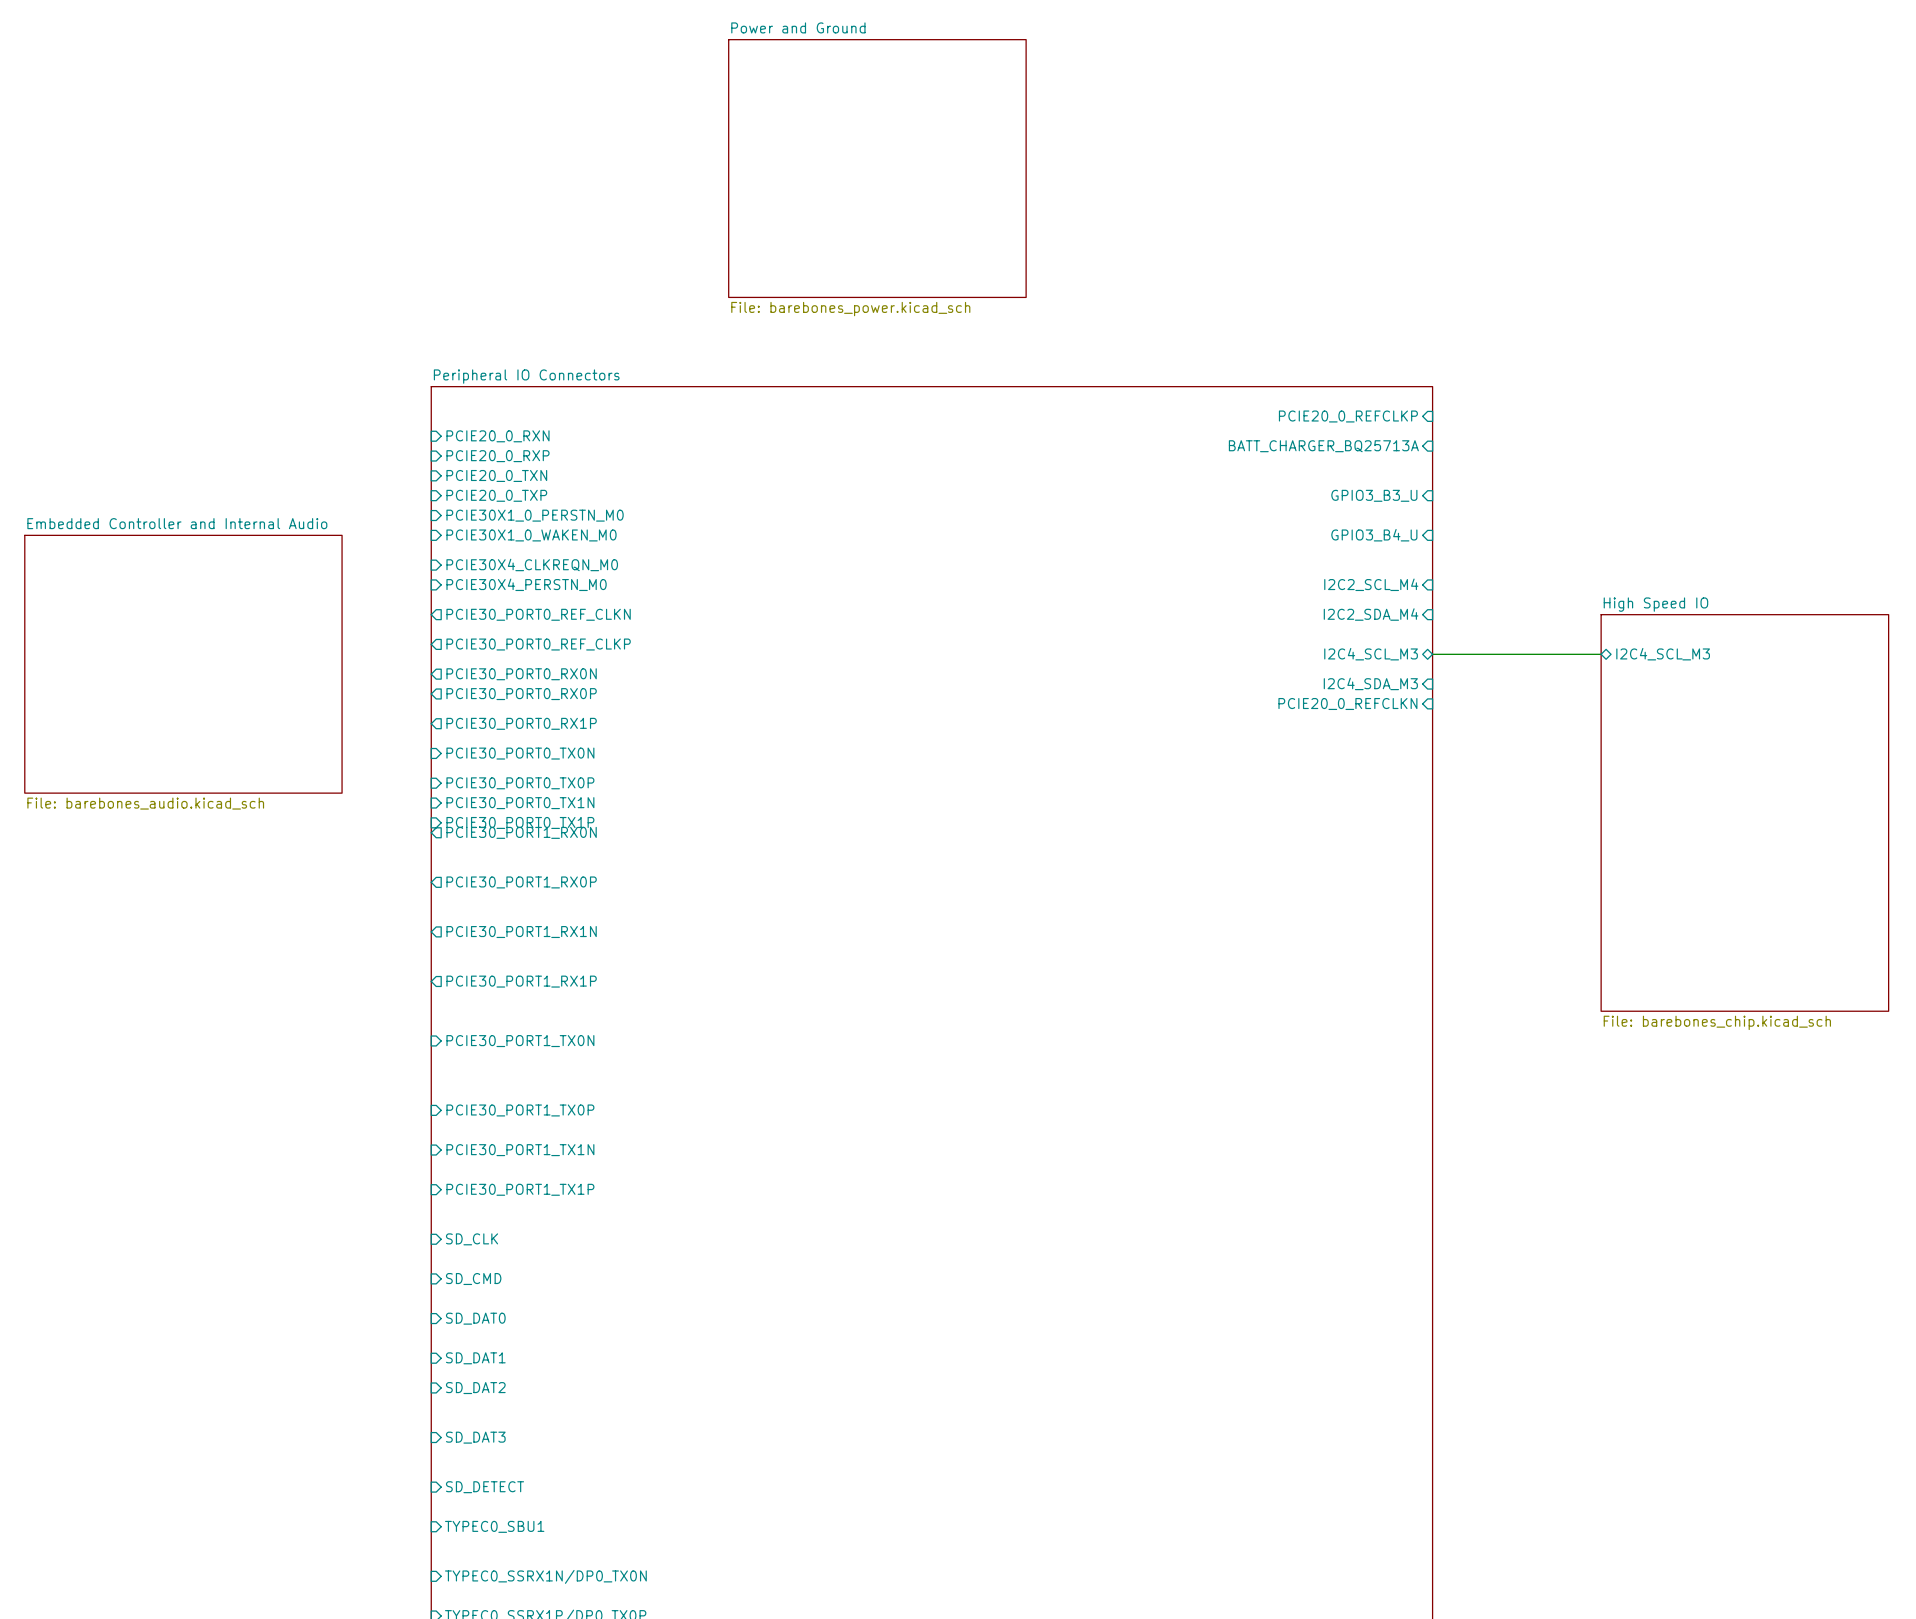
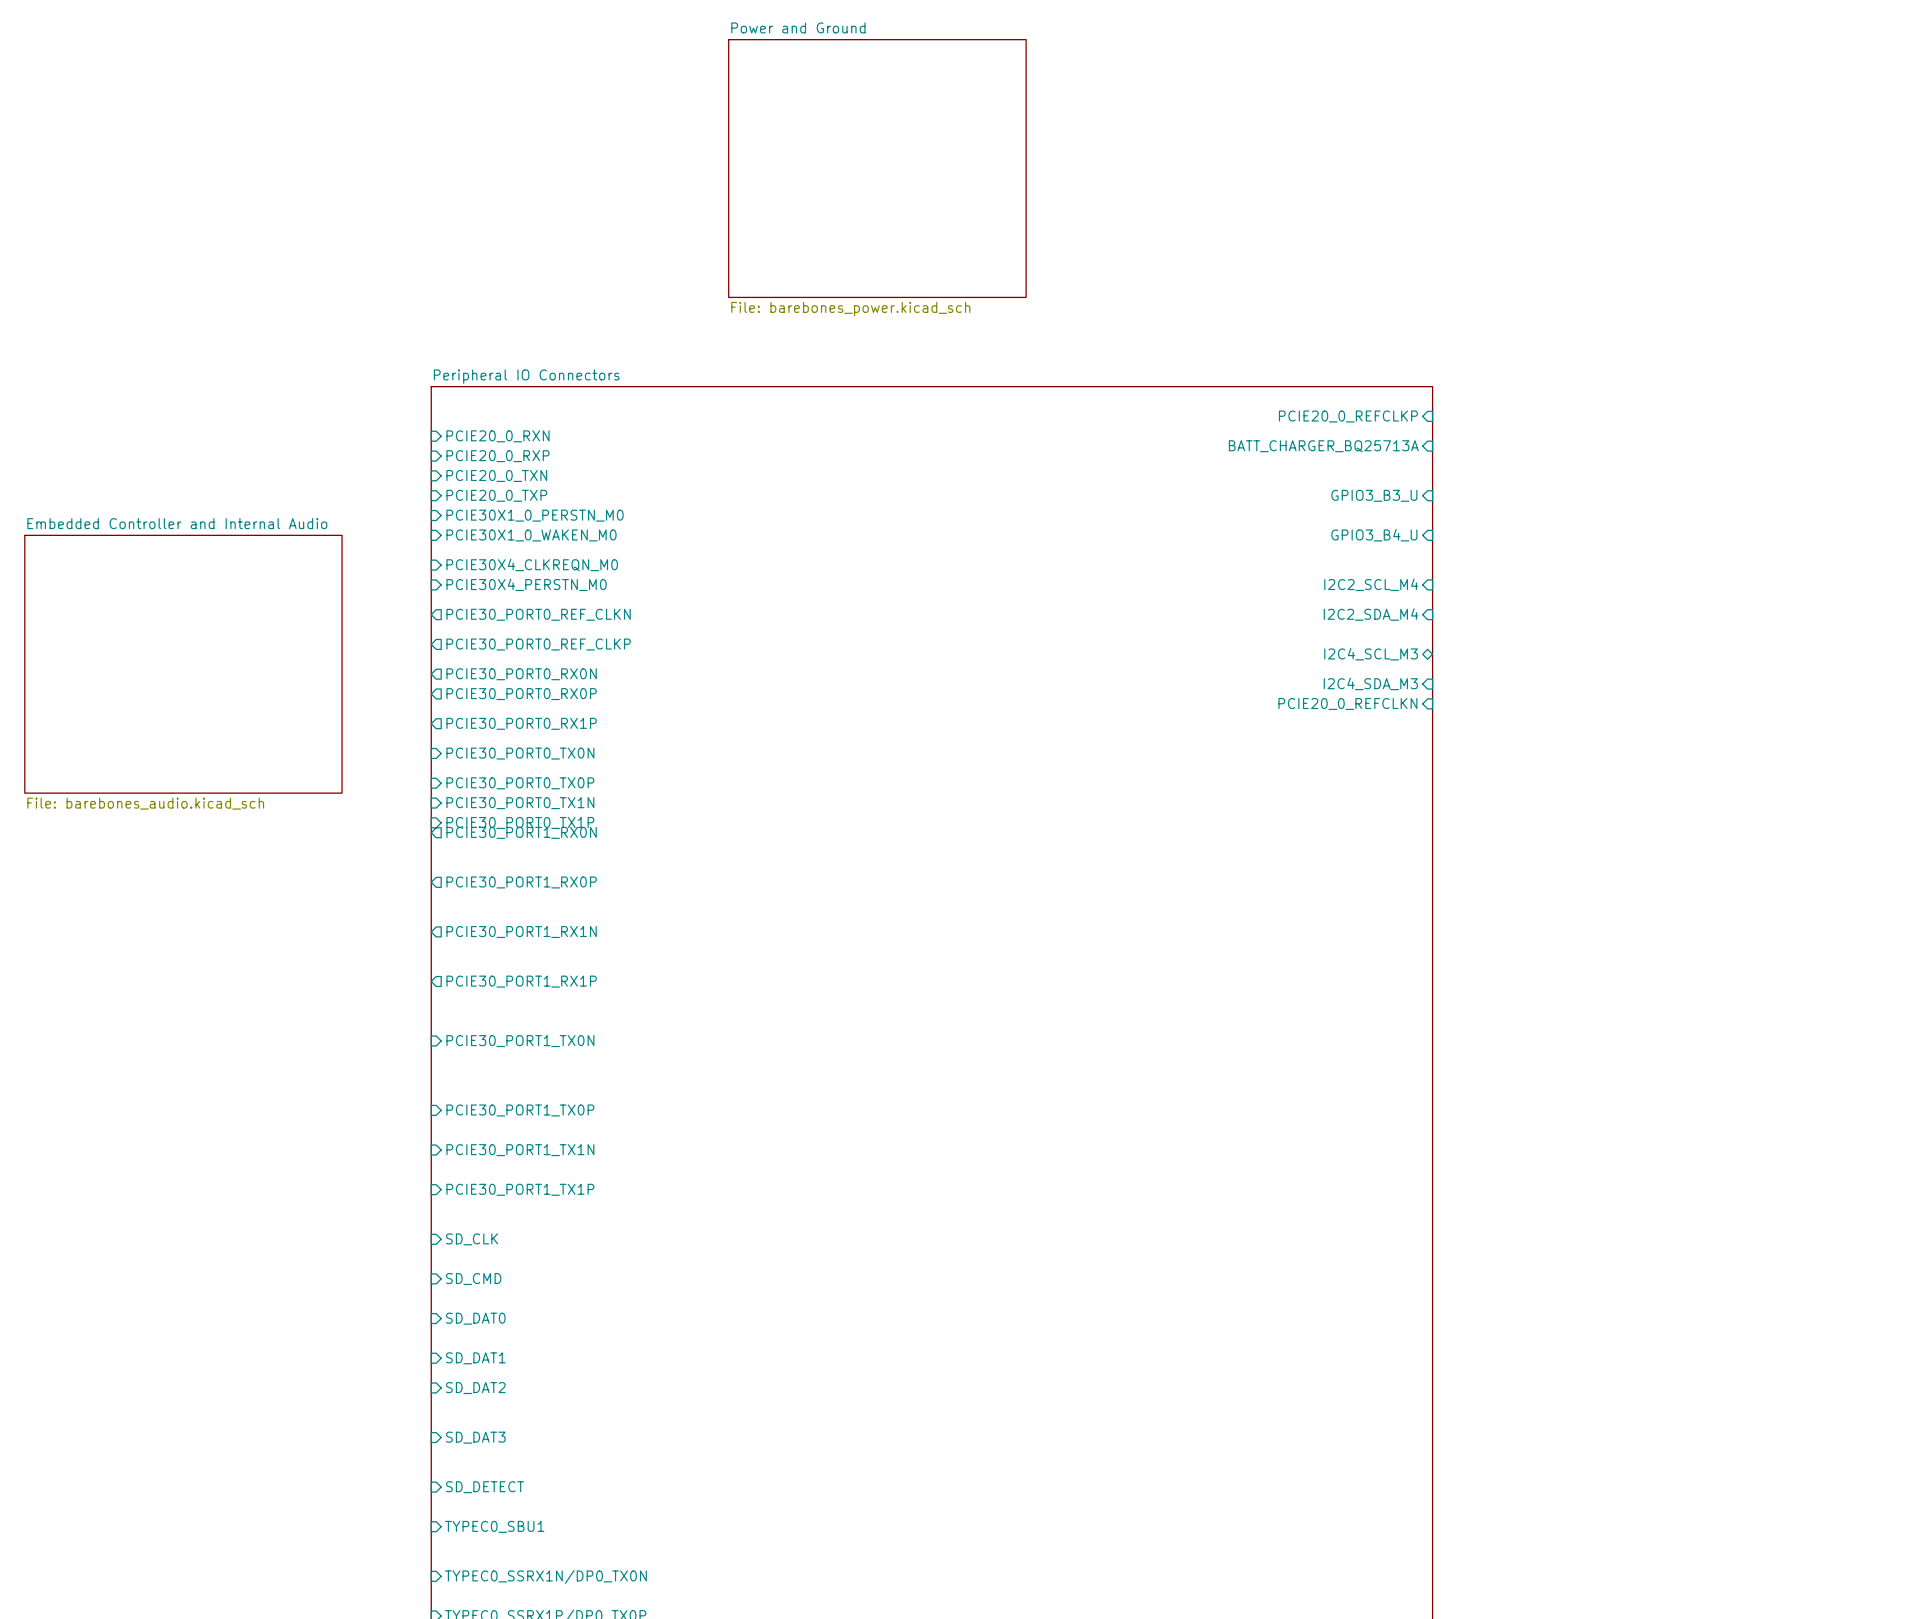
wire: (1432, 654) (1601, 654) -> none
sheet pin: I2C4_SCL_M3 (1663, 654) -> none
sheet High Speed IO: File: barebones_chip.kicad_sch (1744, 812) -> none

